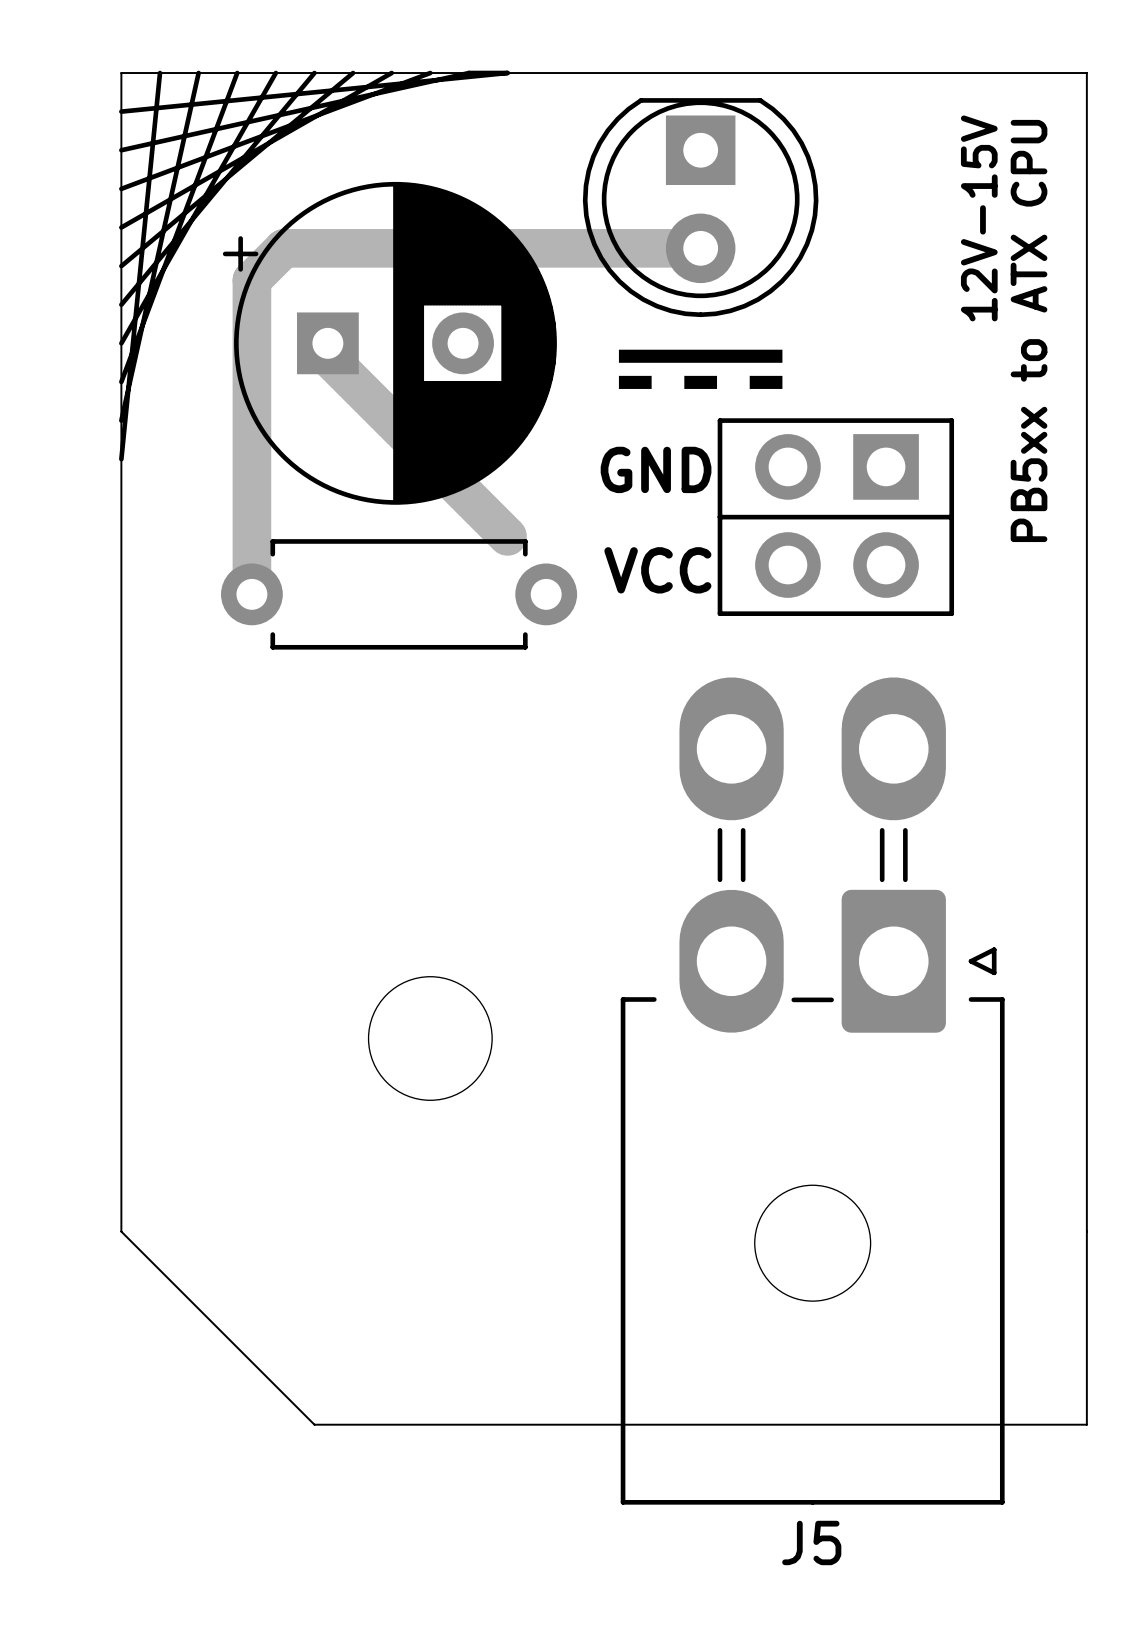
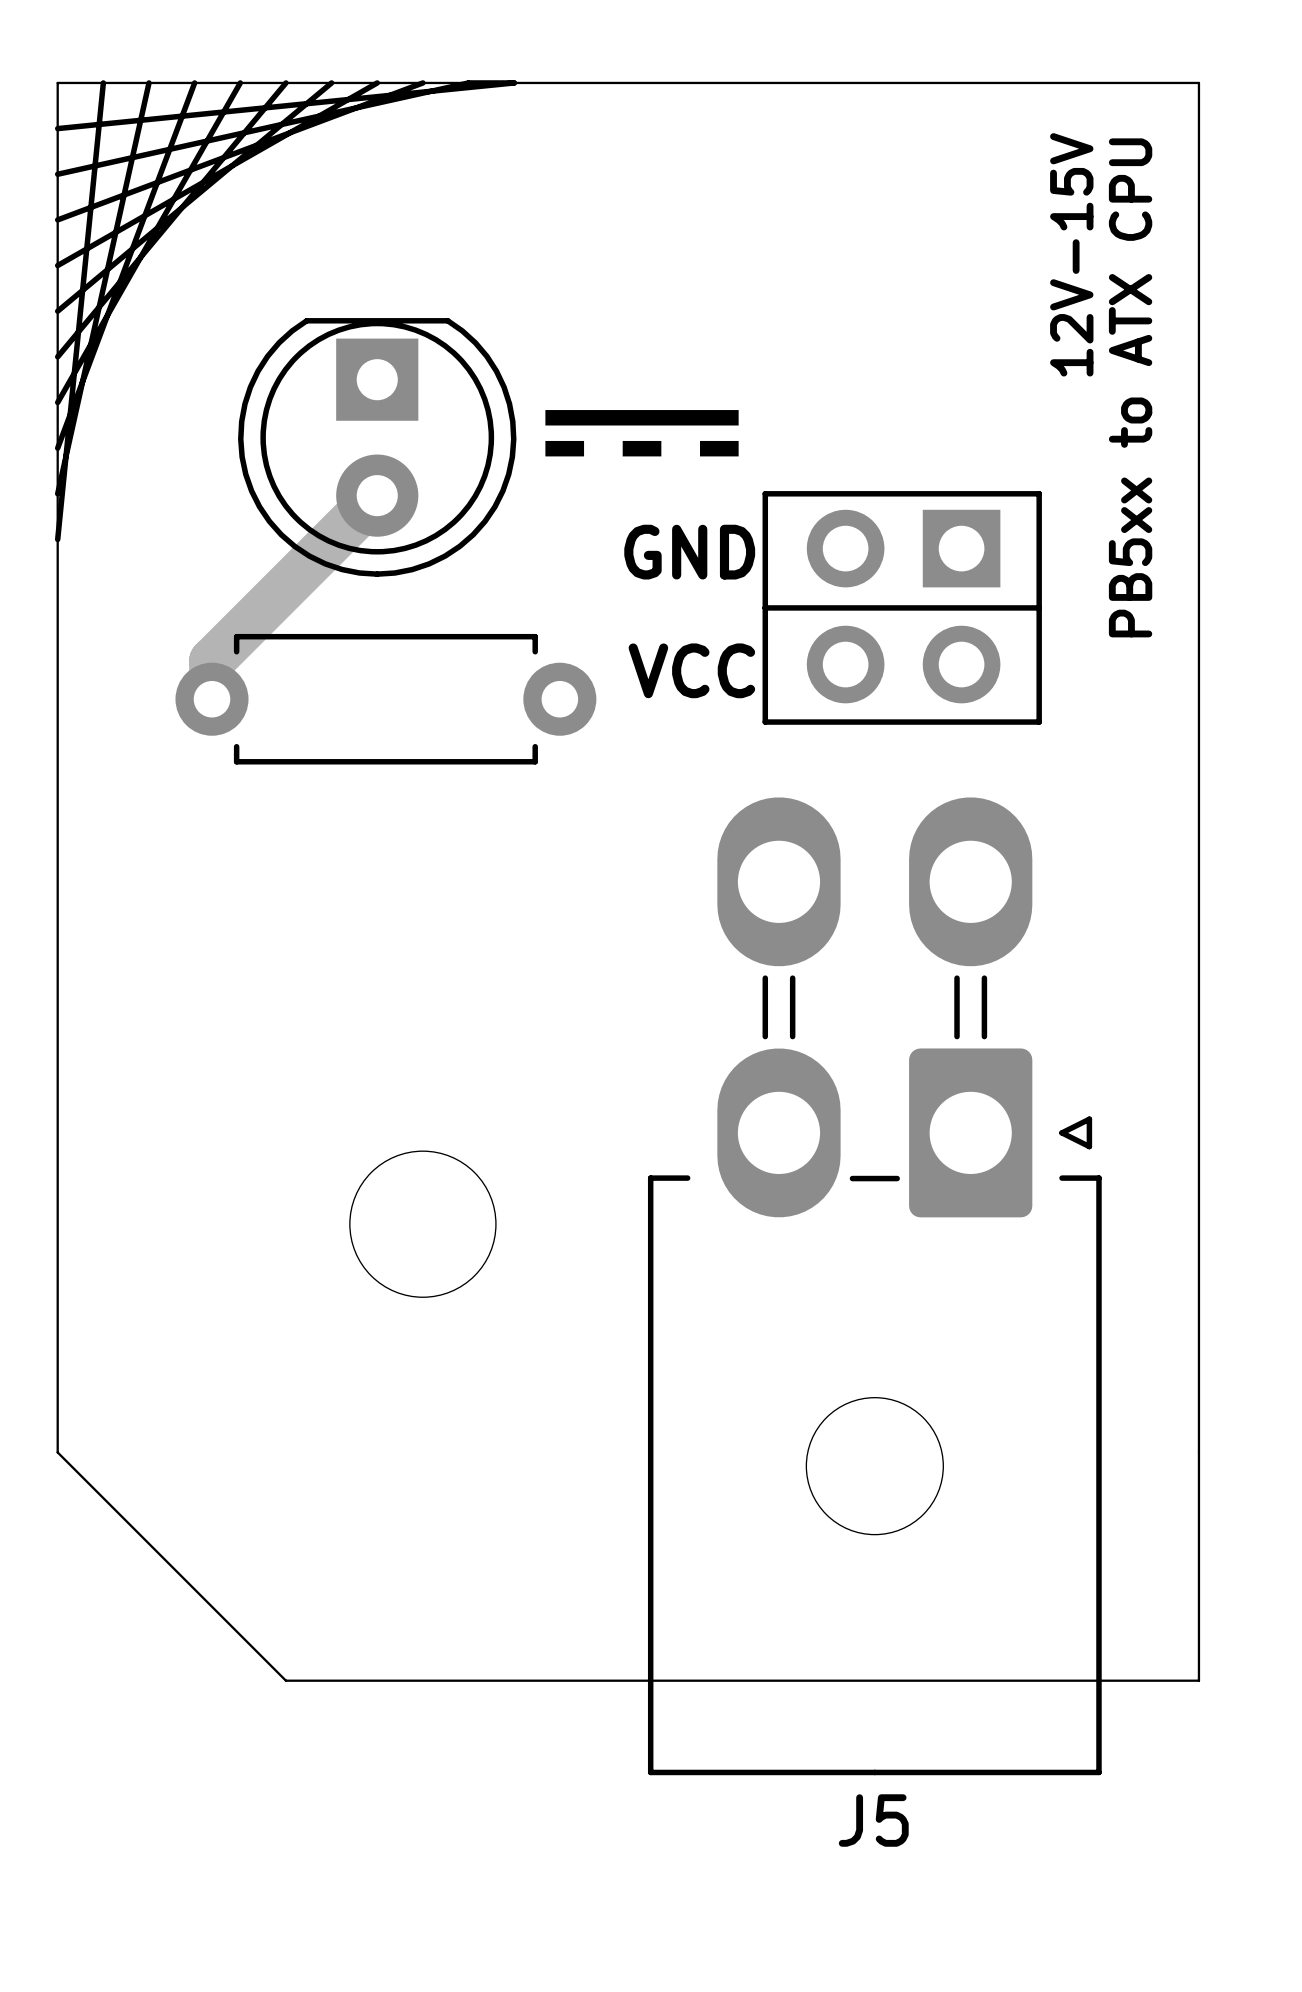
part footprint: [222, 181, 557, 505] -> [238, 318, 517, 577]
part: (700, 207) -> none
track: (700, 248) (283, 248) (251, 280) (251, 561) -> (377, 495) (212, 660)
track: (327, 343) (327, 356) (507, 536) -> none
drawing position: (700, 369) -> (642, 433)

